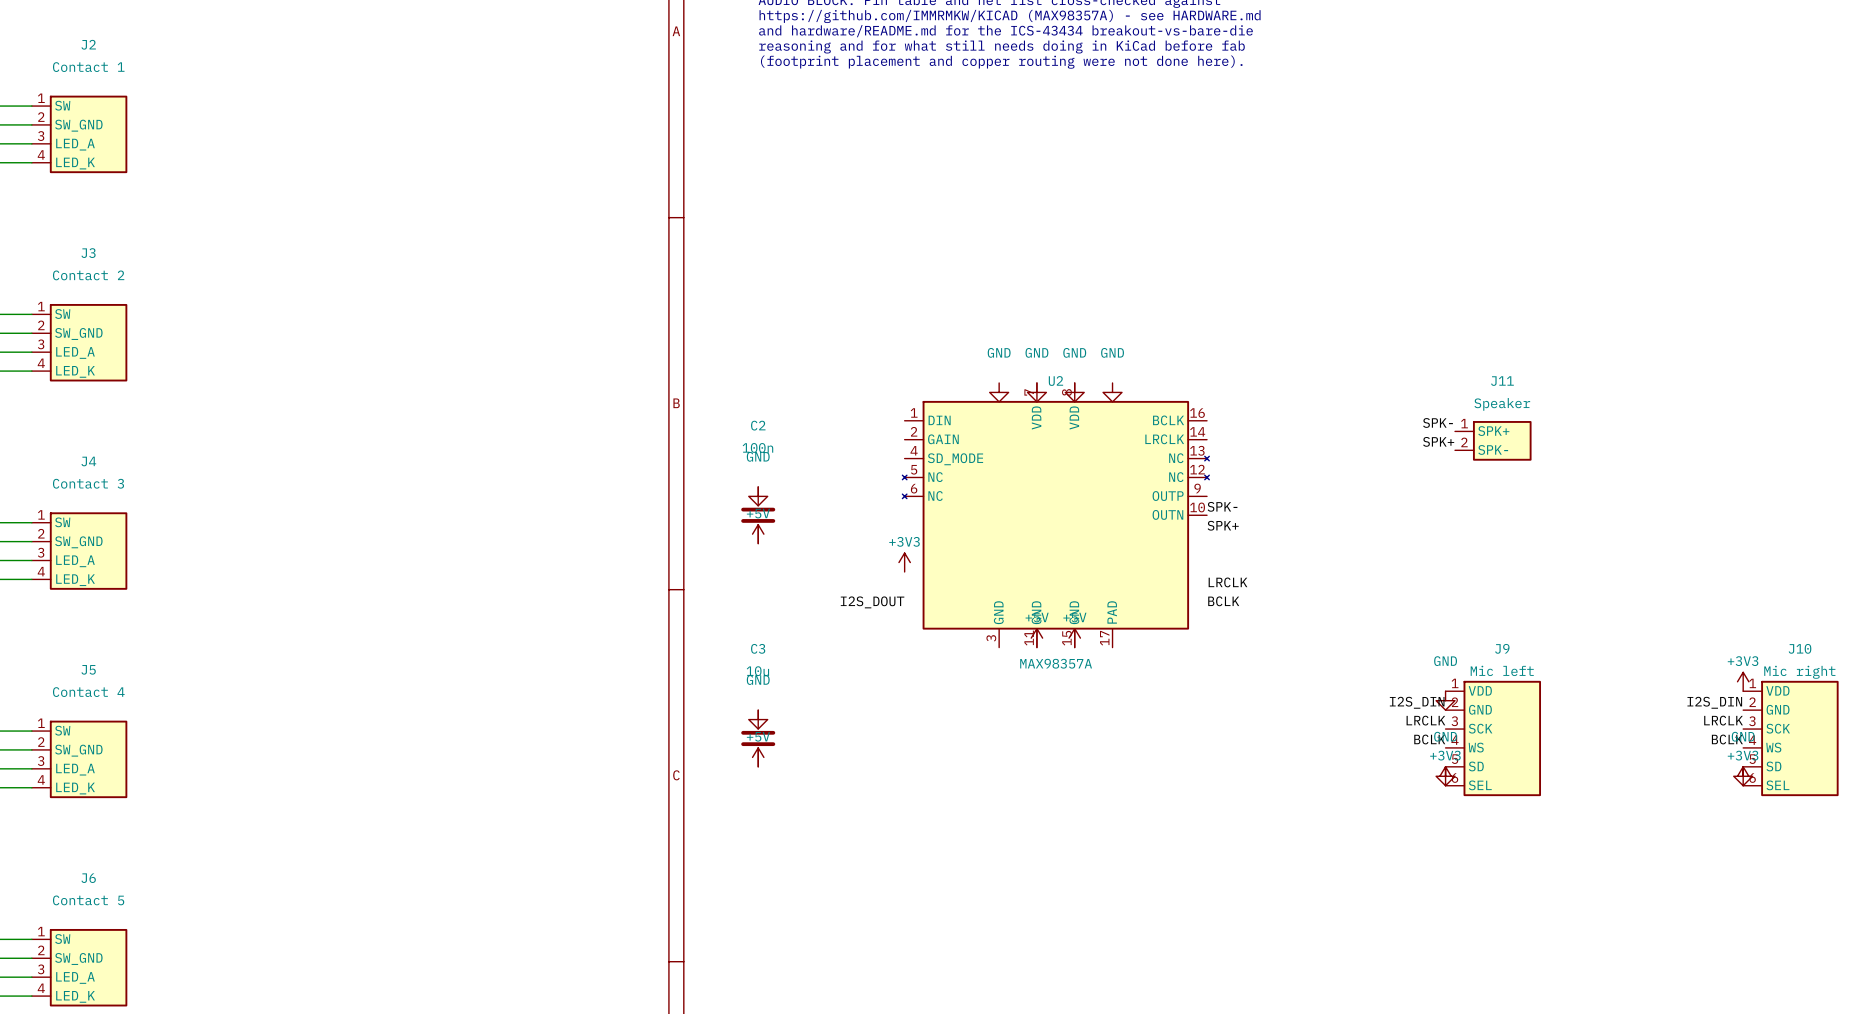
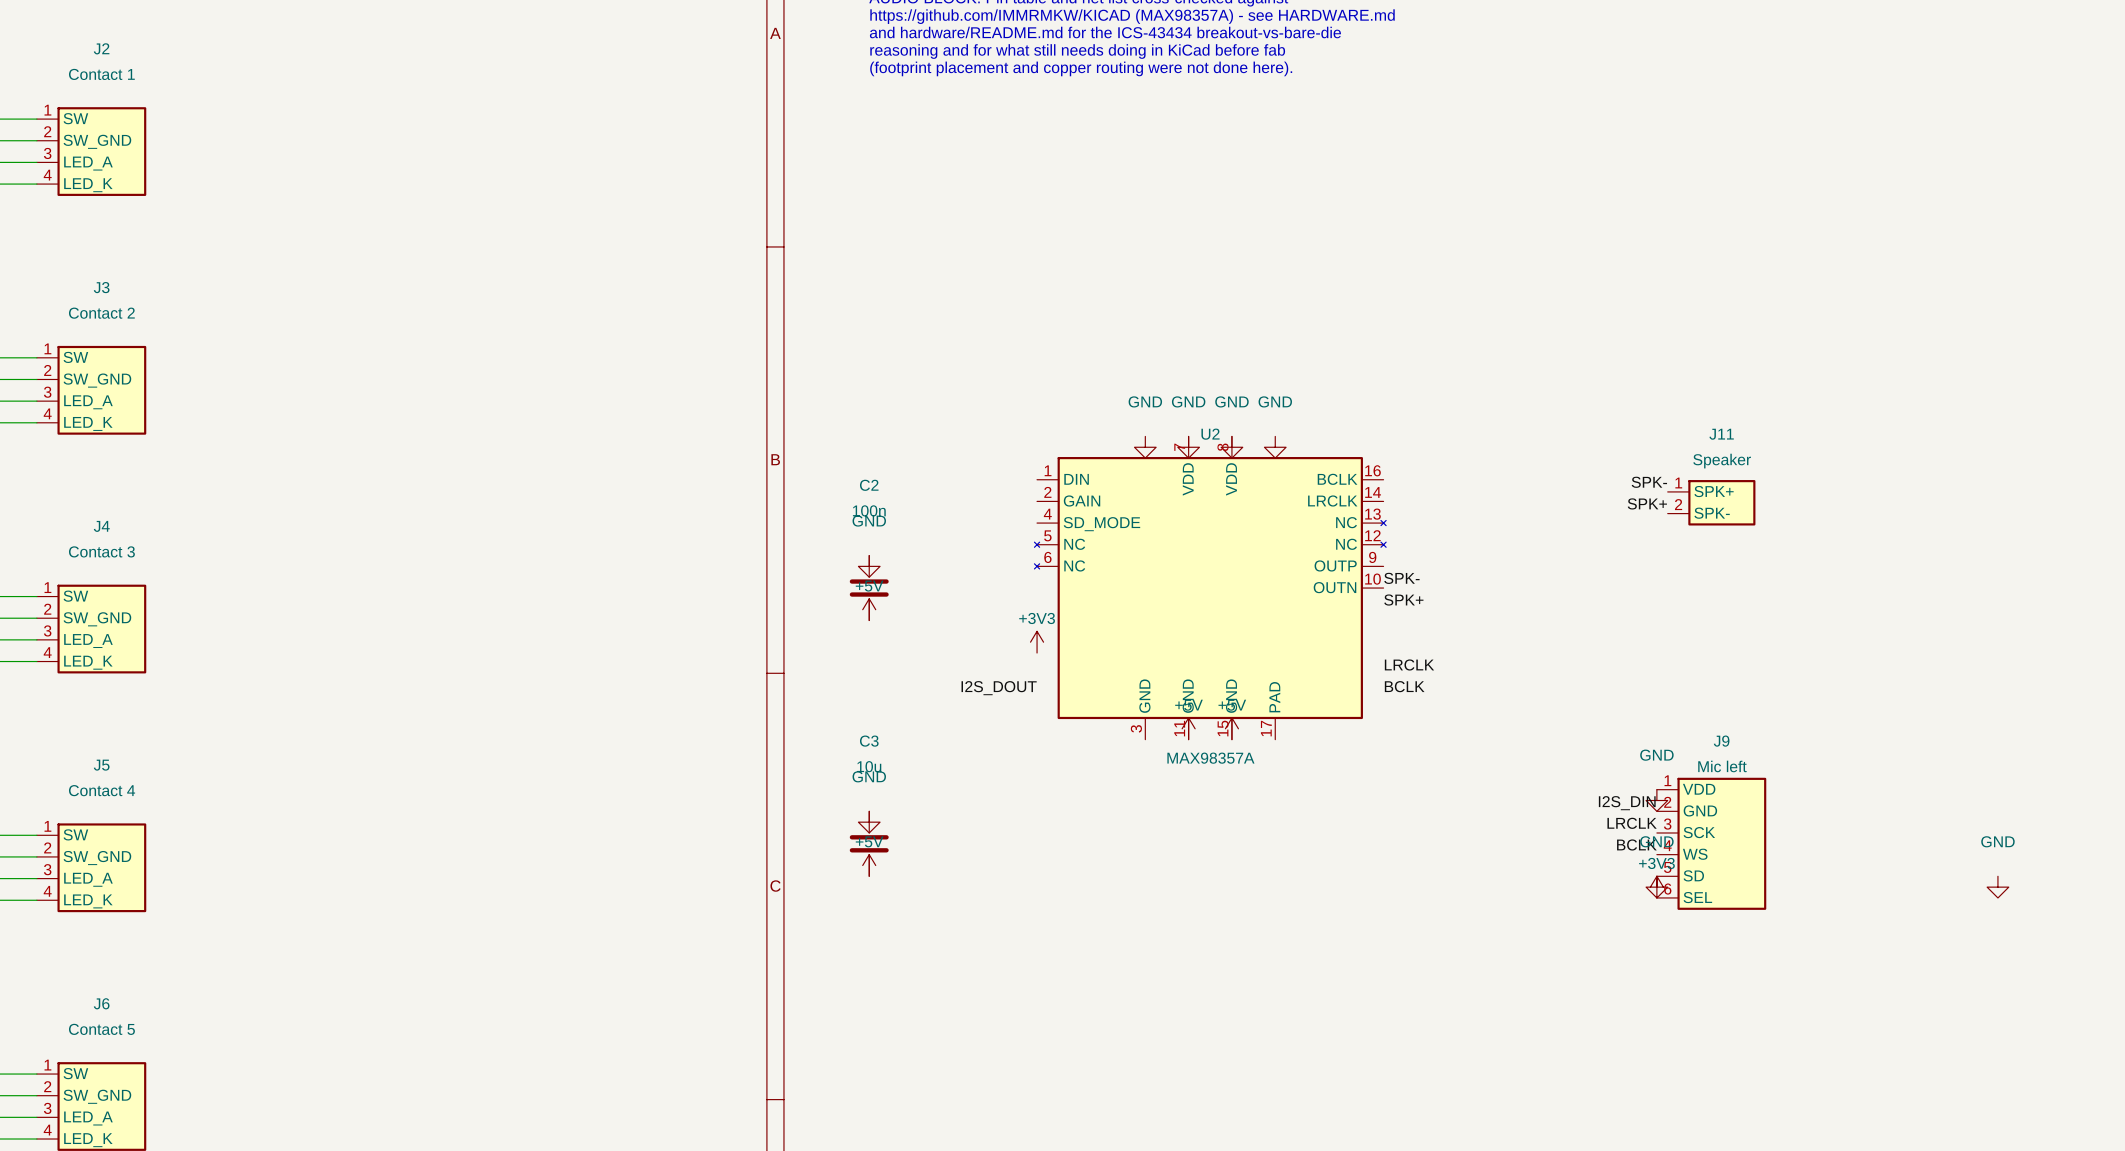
power symbol: +3V3 (1743, 681) -> none
label: I2S_DIN (1714, 702) -> none
label: LRCLK (1723, 720) -> none
J10: Mic right (1790, 738) -> none
label: BCLK (1727, 739) -> none
power symbol: +3V3 (1743, 776) -> none

